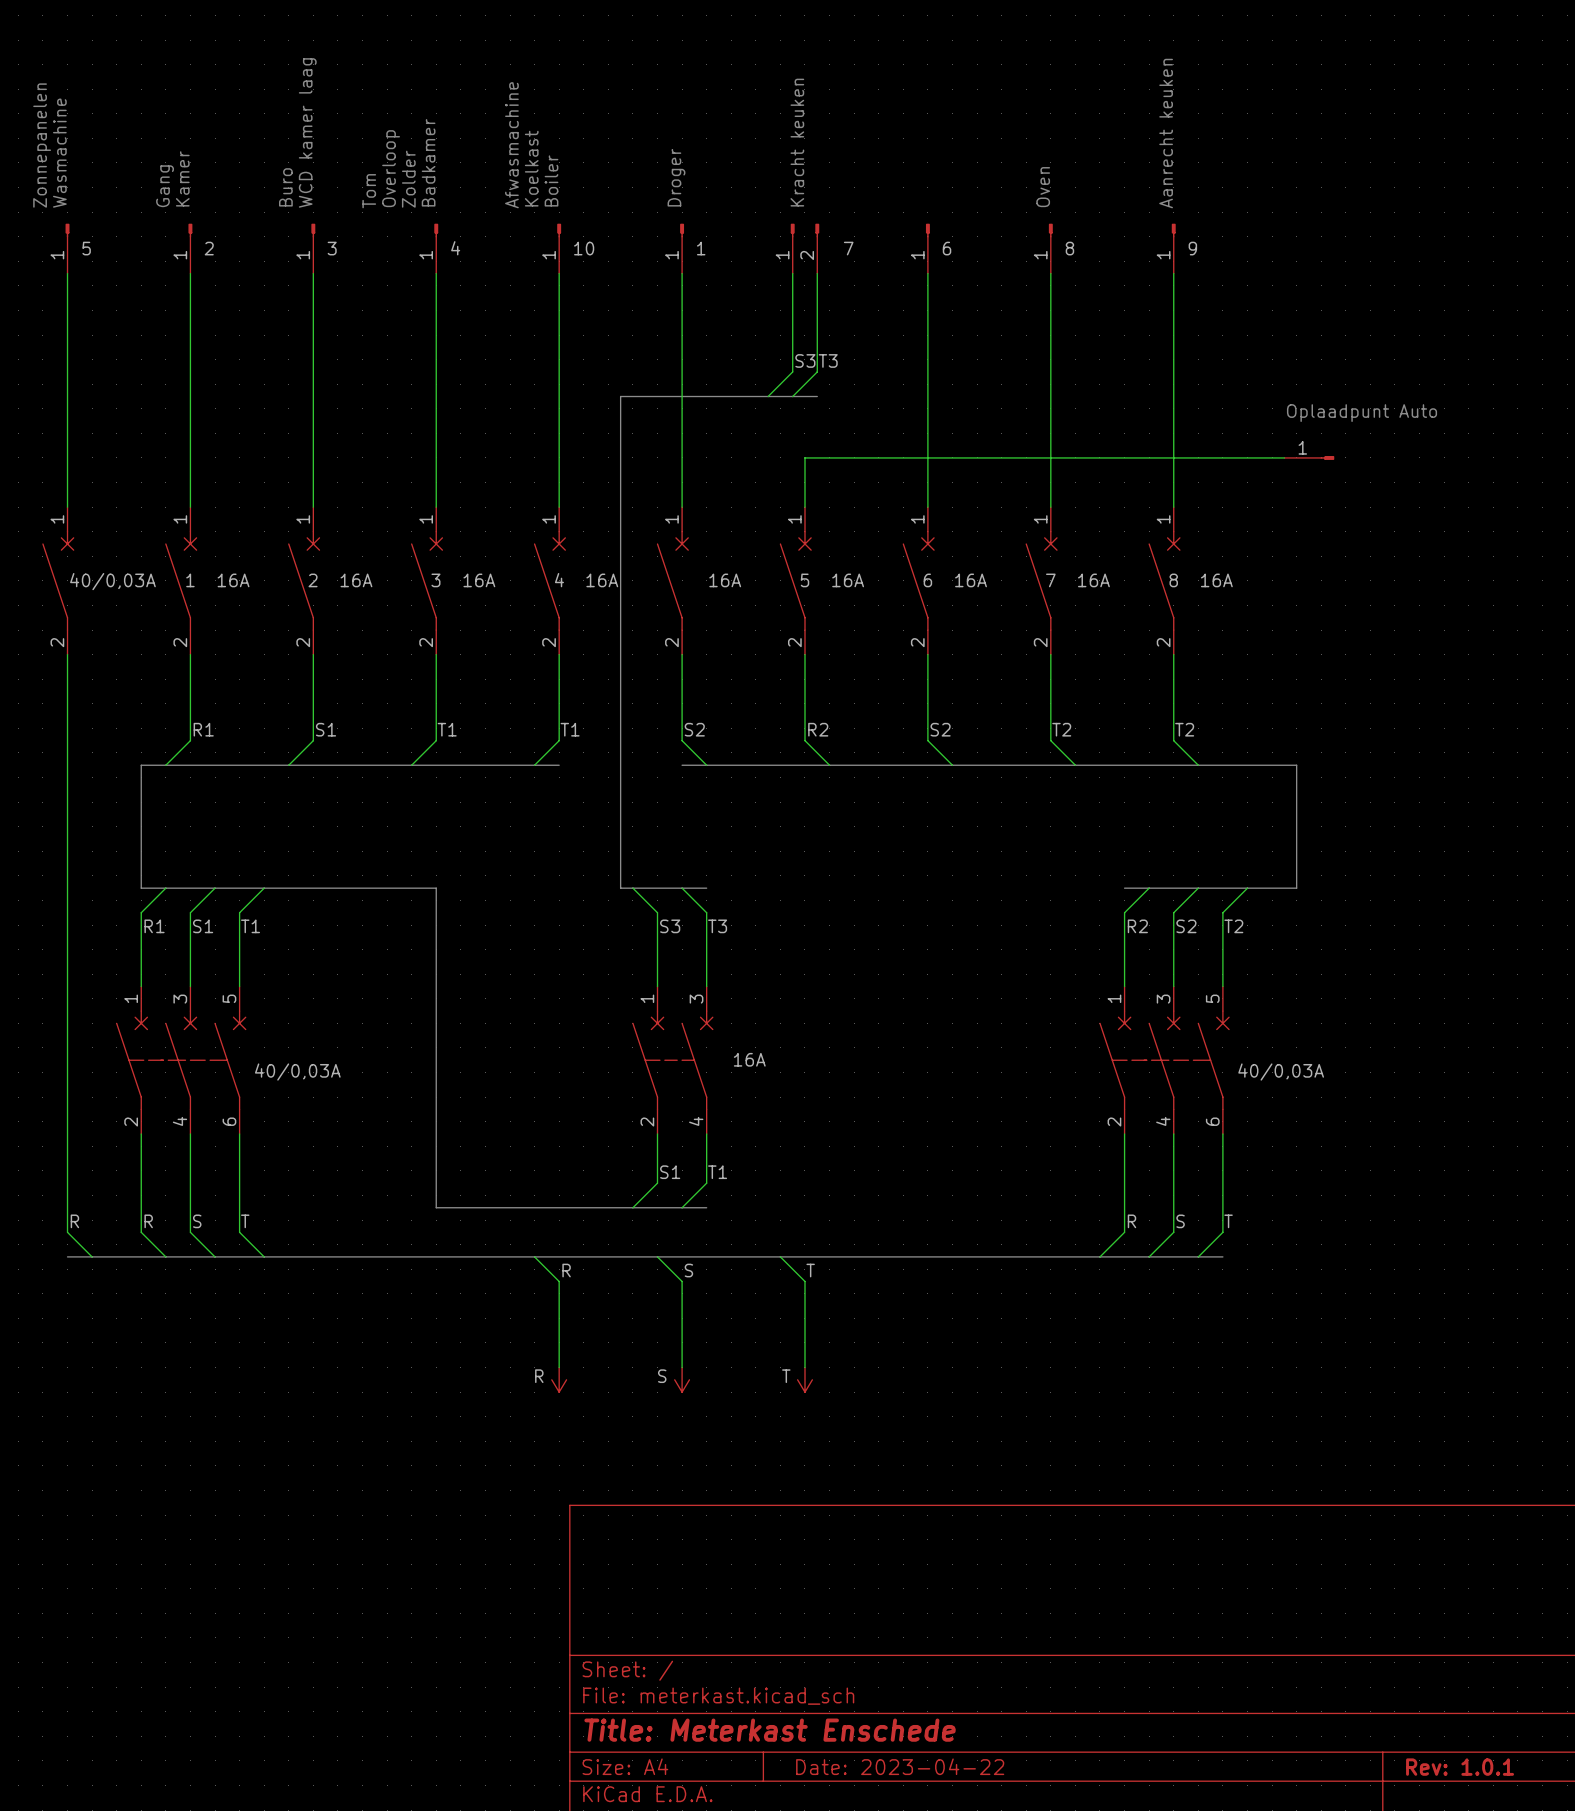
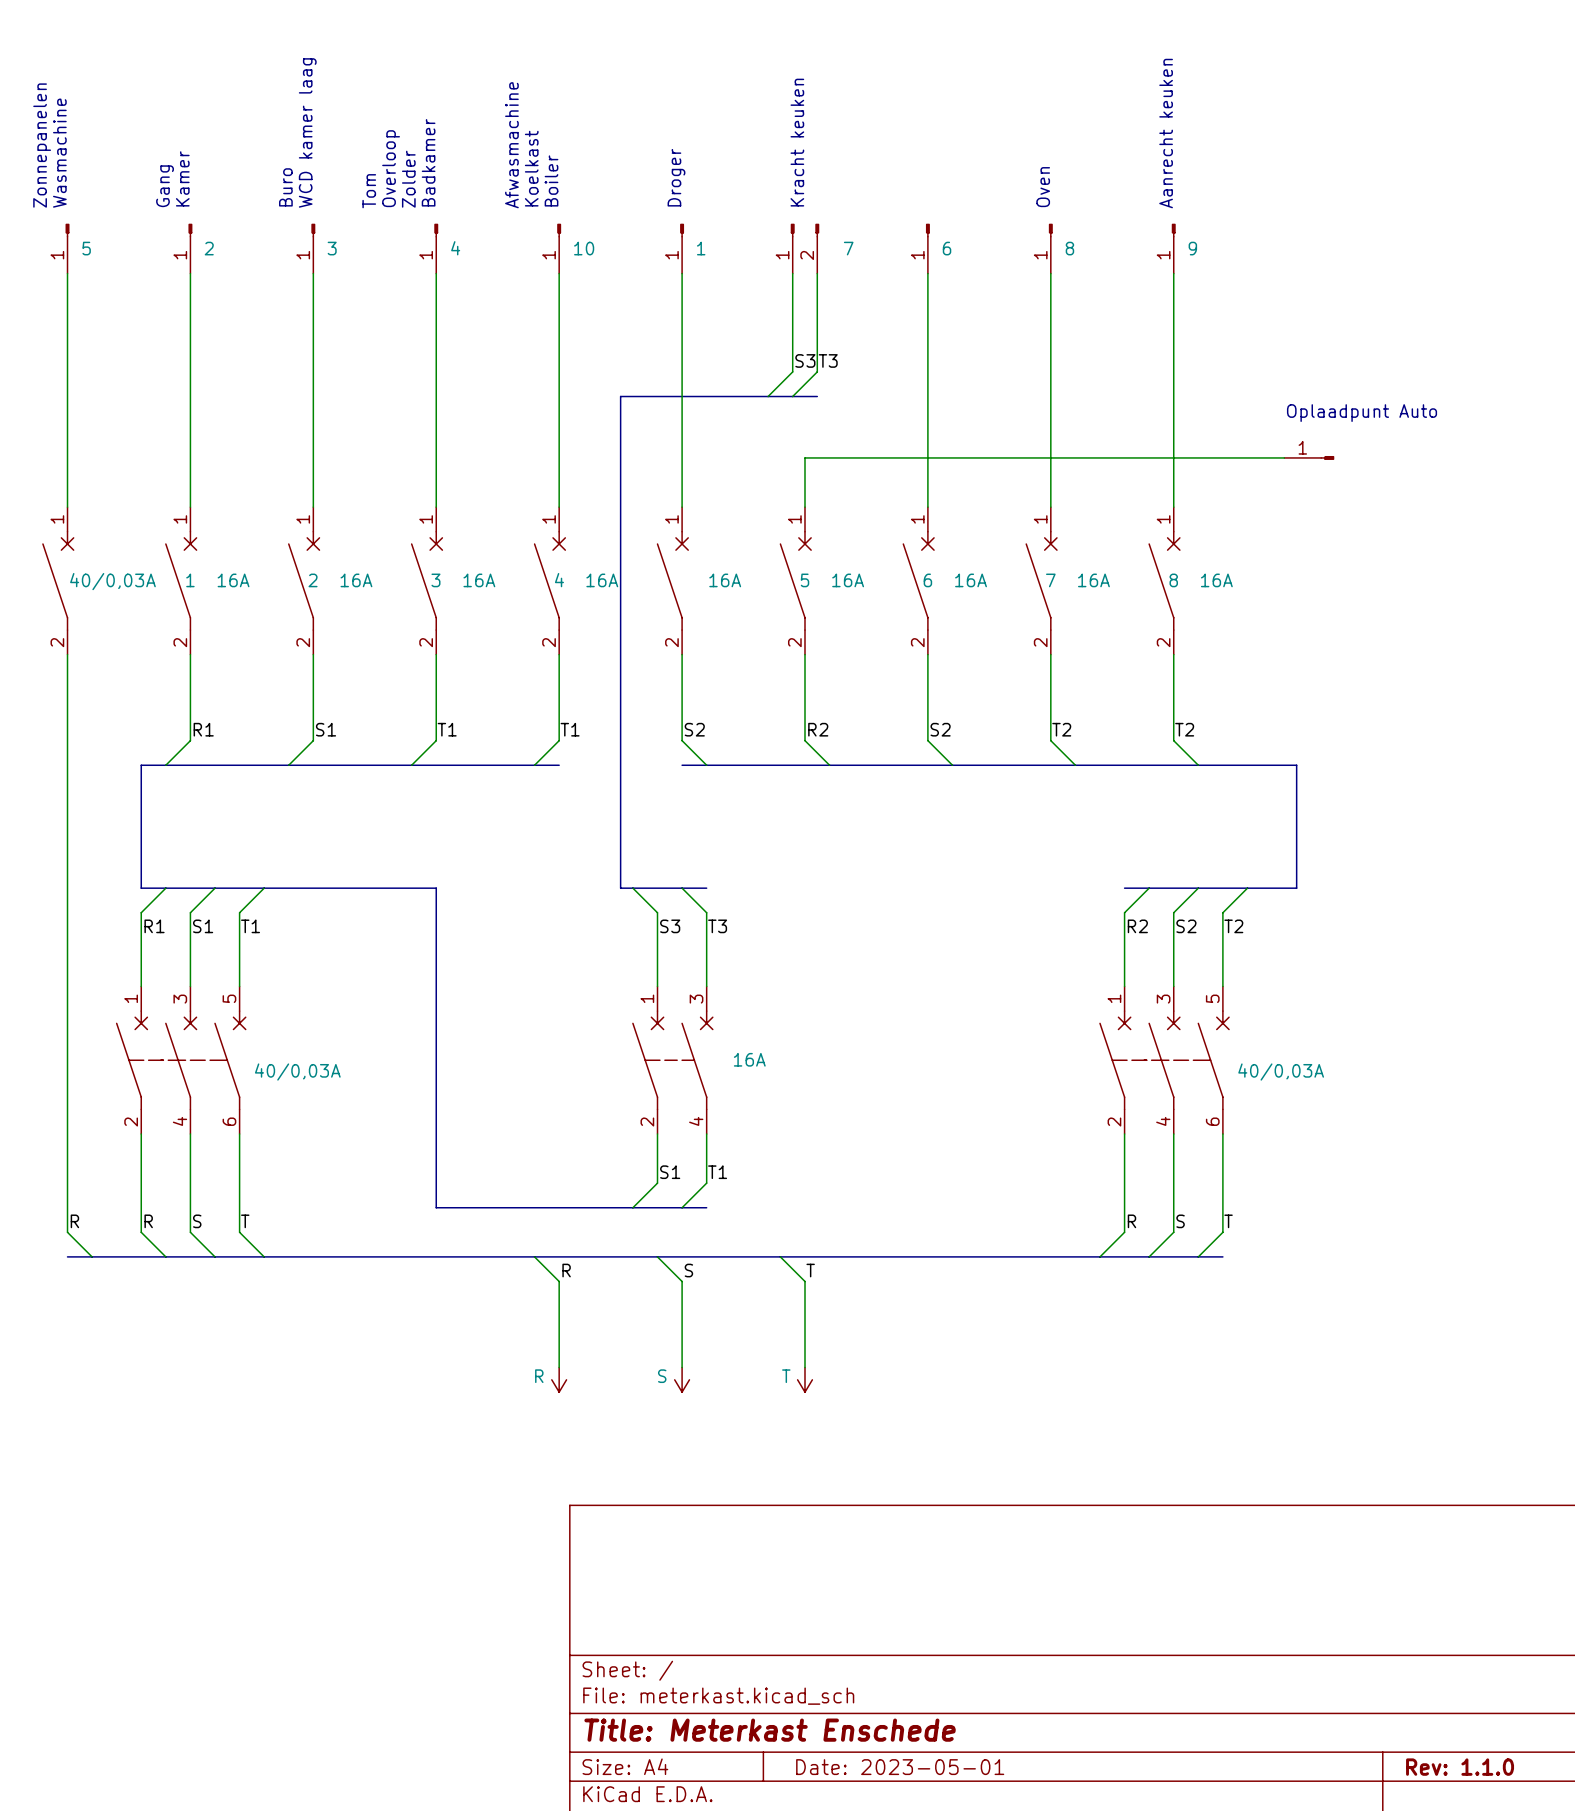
title block: Date: 2023-04-22 (900, 1766) -> Date: 2023-05-01 (900, 1767)
title block: Rev: 1.0.1 (1460, 1767) -> Rev: 1.1.0 (1460, 1767)

